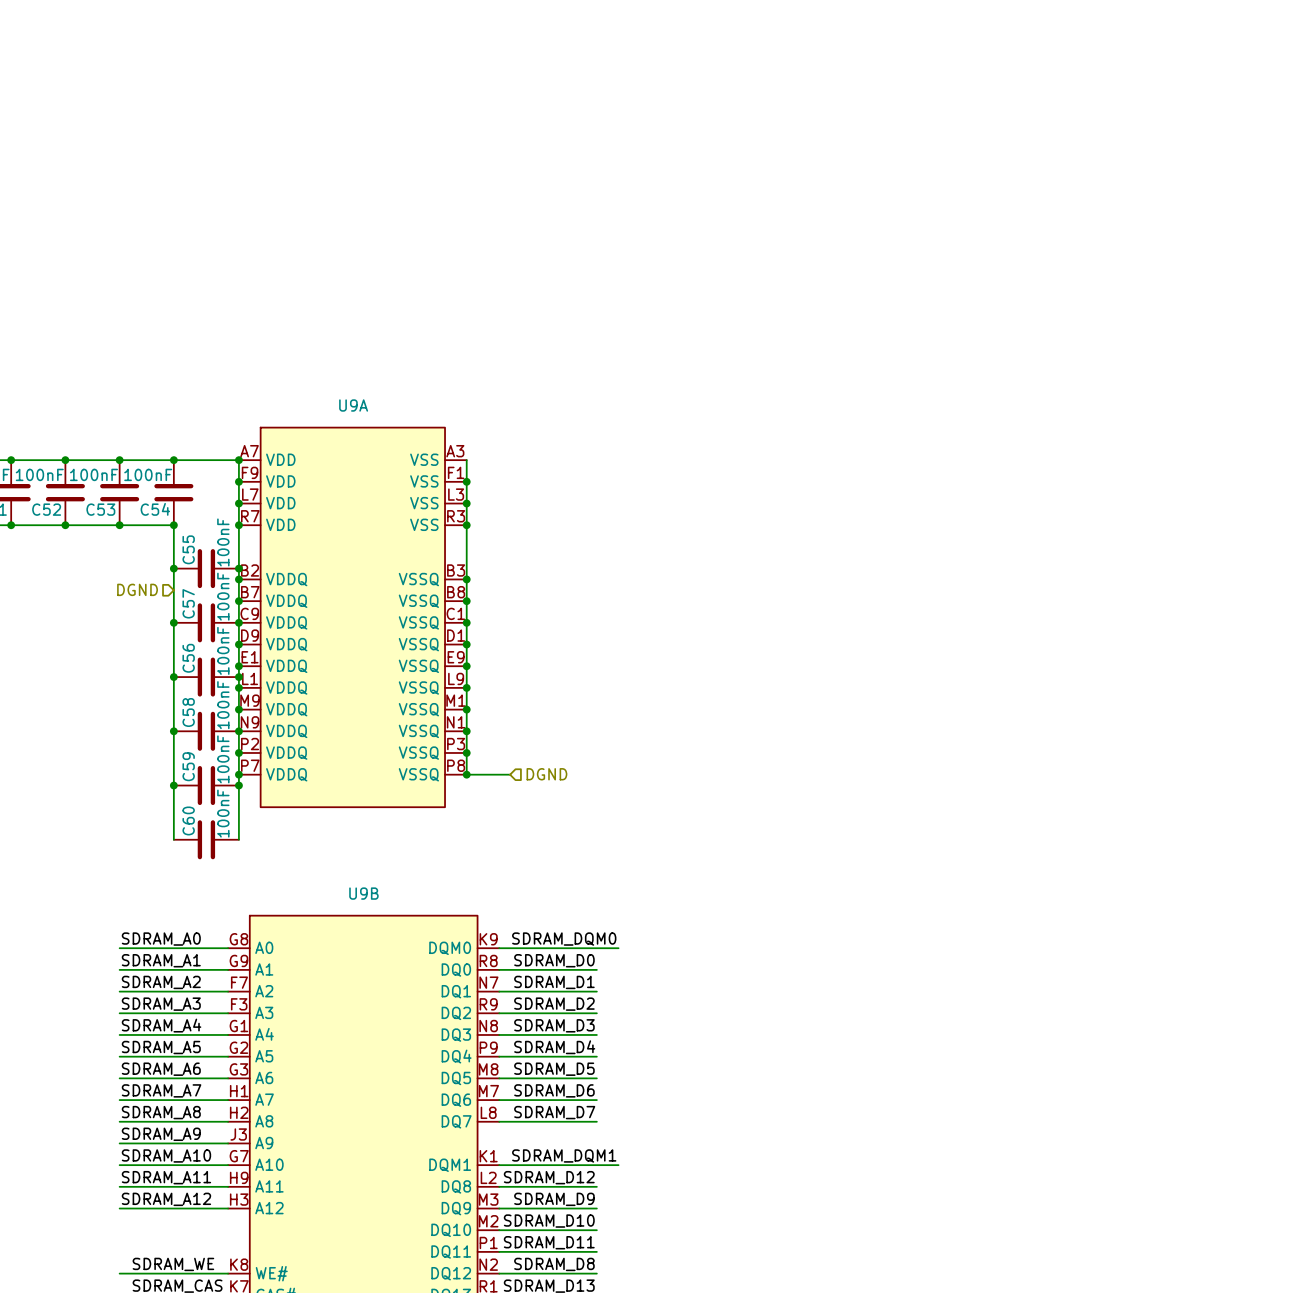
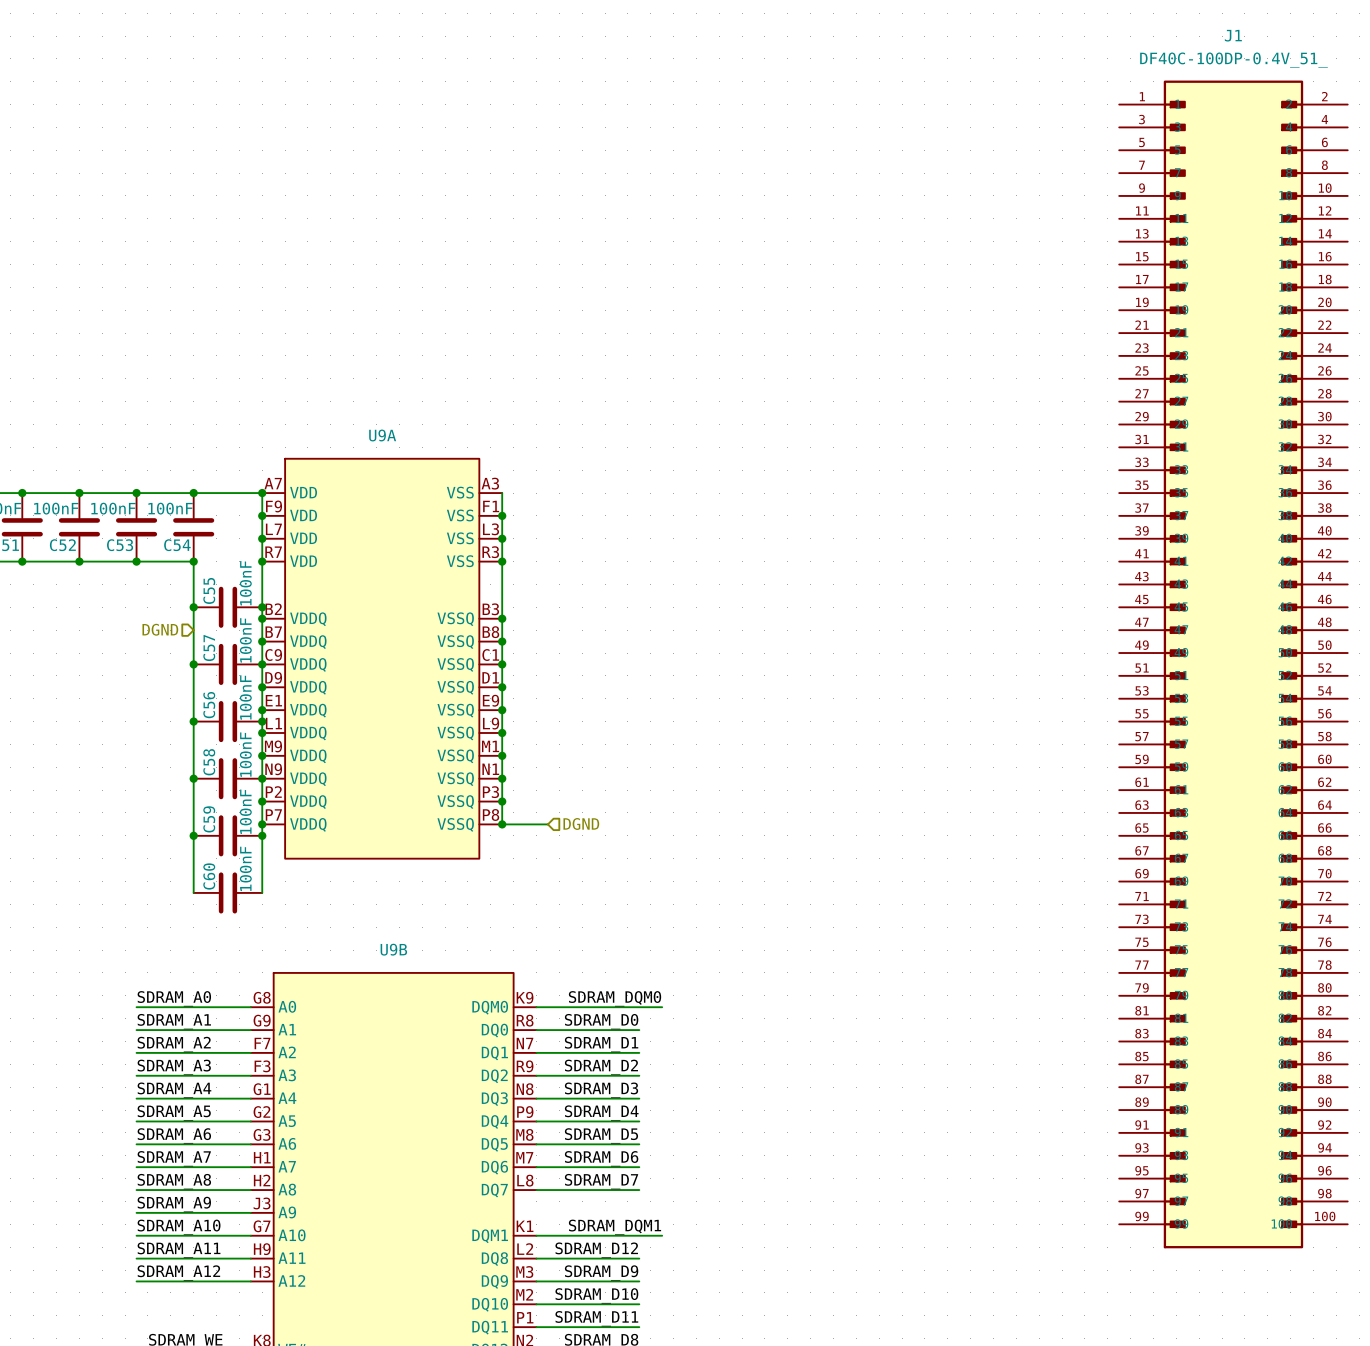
J1: none -> DF40C-100DP-0.4V_51_ (1233, 664)

